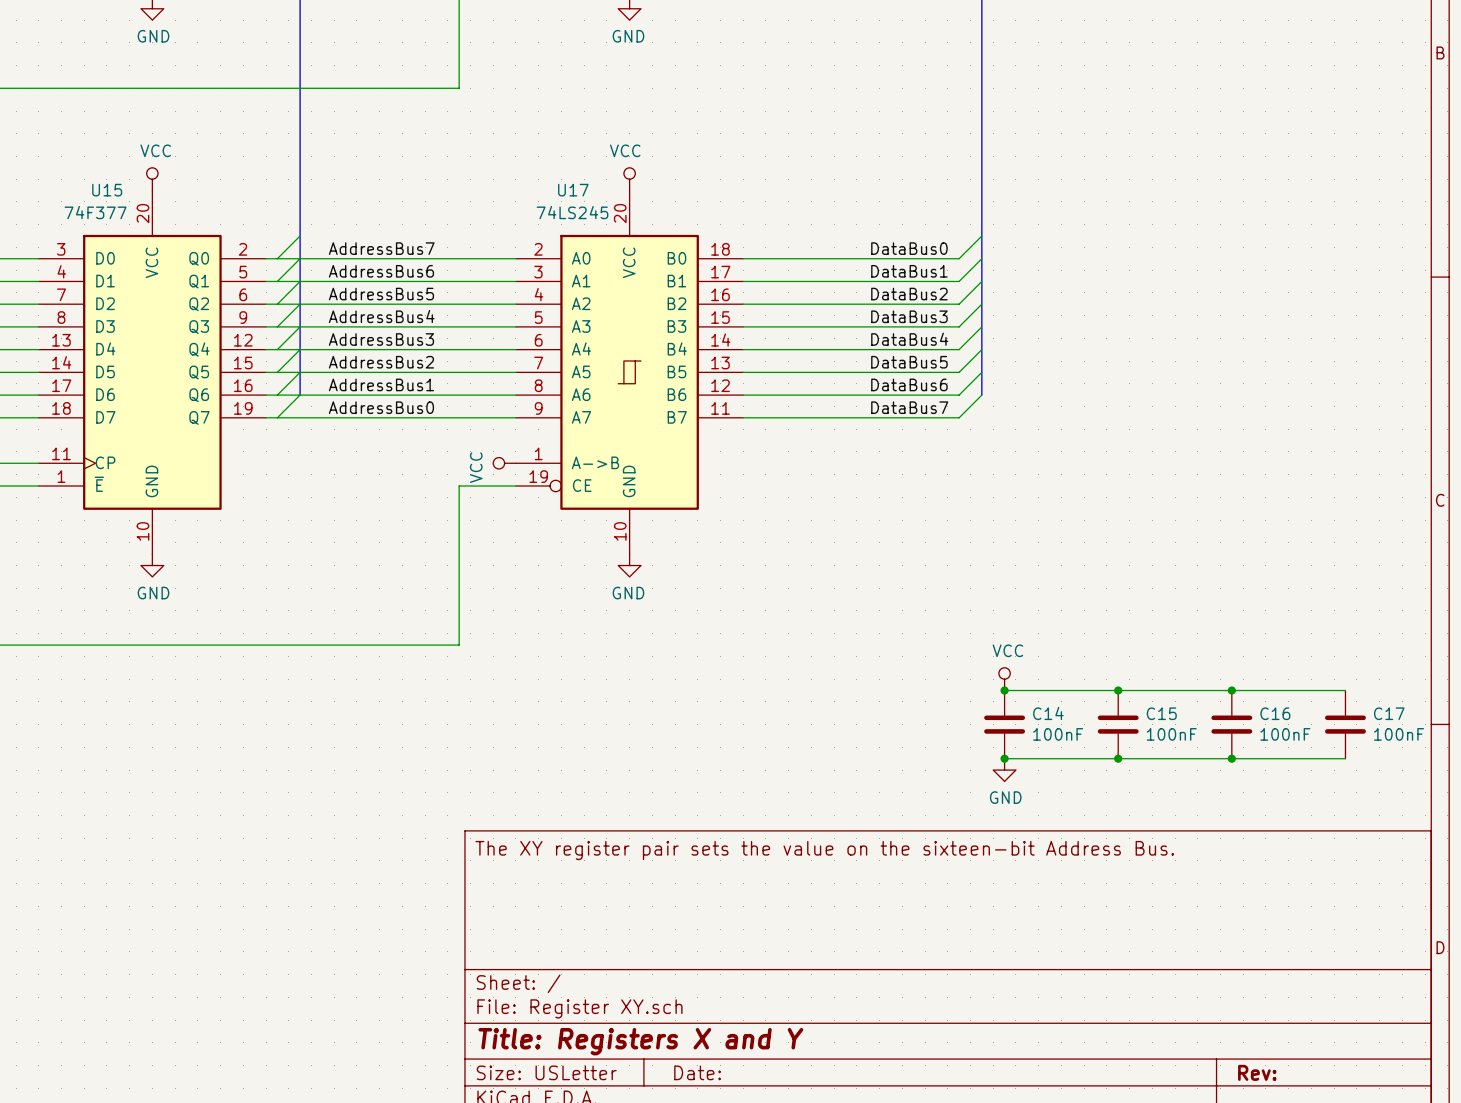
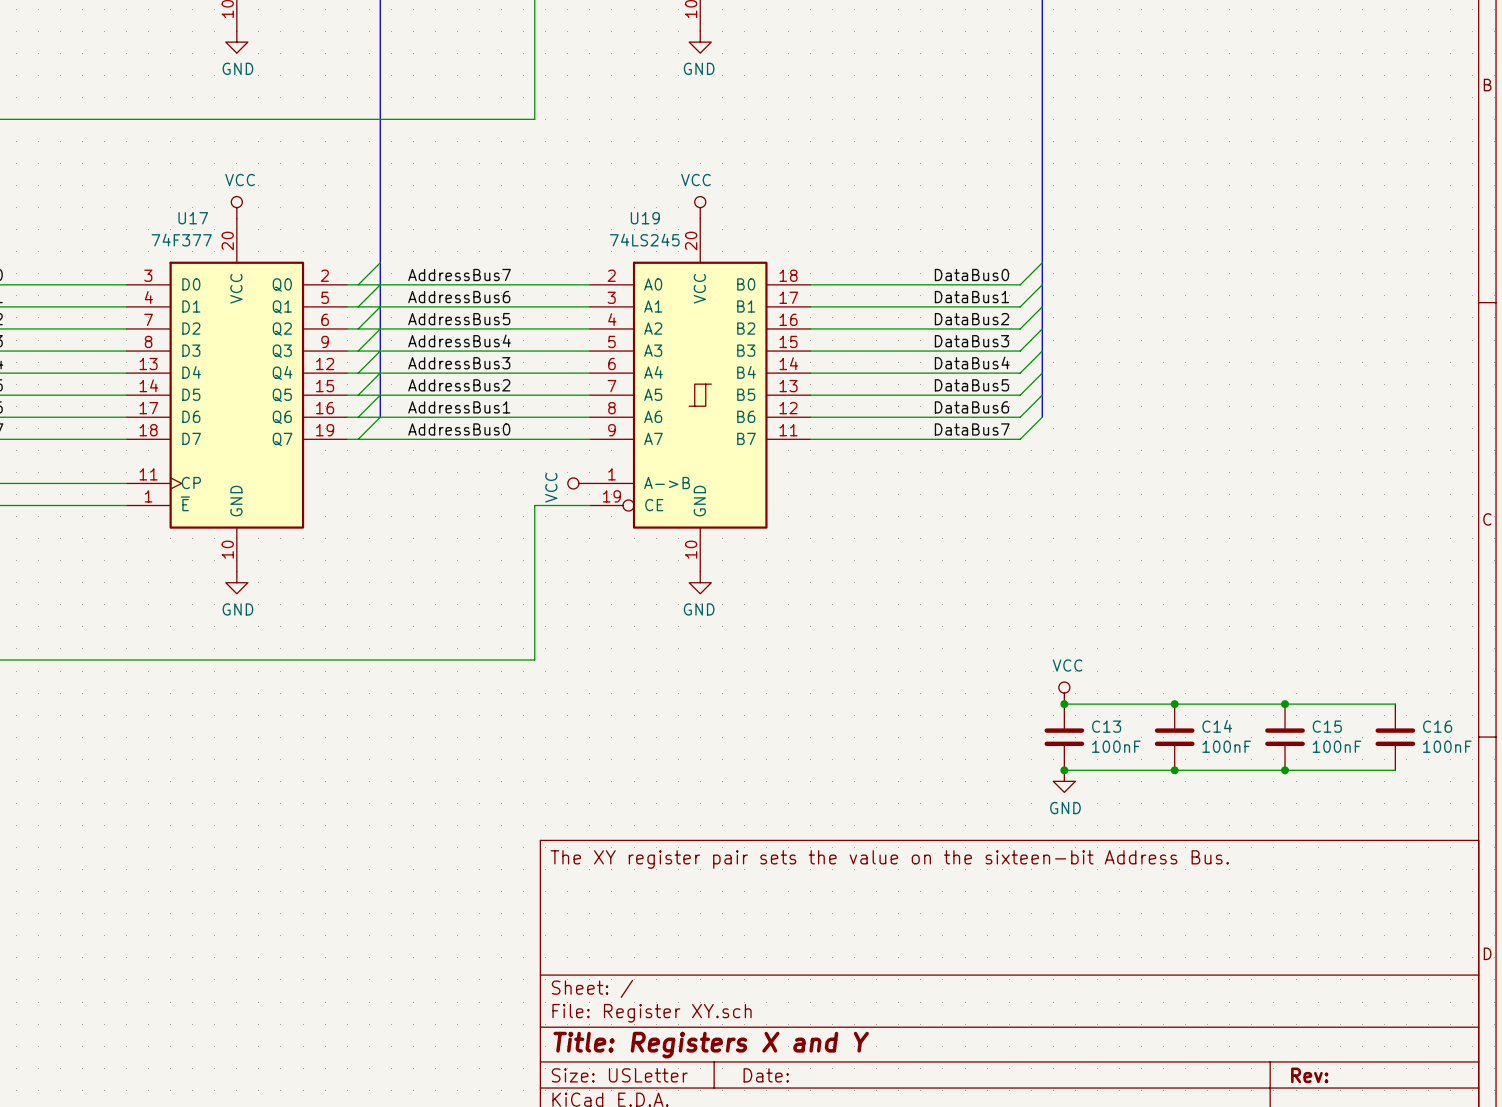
U15 name: U15 (107, 190) -> U17 (193, 218)
U17 name: U17 (573, 190) -> U19 (645, 218)
C14 name: C14 (1048, 713) -> C13 (1106, 726)
C15 name: C15 (1161, 713) -> C14 (1217, 726)
C16 name: C16 (1275, 713) -> C15 (1327, 726)
C17 name: C17 (1389, 713) -> C16 (1437, 726)

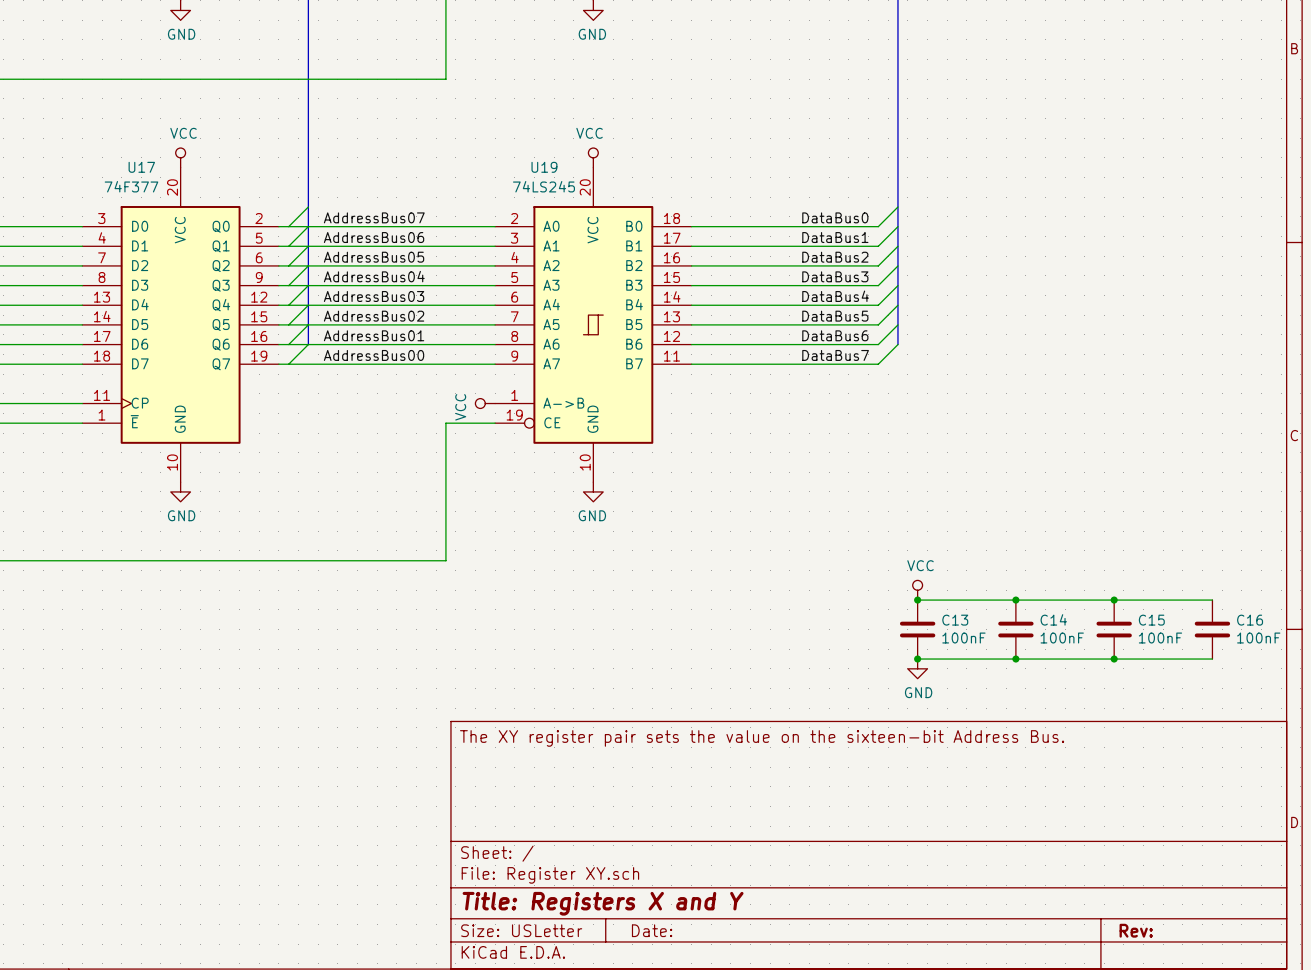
label: AddressBus7 (459, 274) -> AddressBus07 (374, 217)
label: AddressBus6 (459, 297) -> AddressBus06 (374, 237)
label: AddressBus5 (459, 319) -> AddressBus05 (374, 257)
label: AddressBus4 (459, 340) -> AddressBus04 (374, 276)
label: AddressBus3 (459, 363) -> AddressBus03 (374, 296)
label: AddressBus2 (459, 385) -> AddressBus02 (374, 316)
label: AddressBus1 (459, 407) -> AddressBus01 (374, 335)
label: AddressBus0 (459, 429) -> AddressBus00 (374, 355)

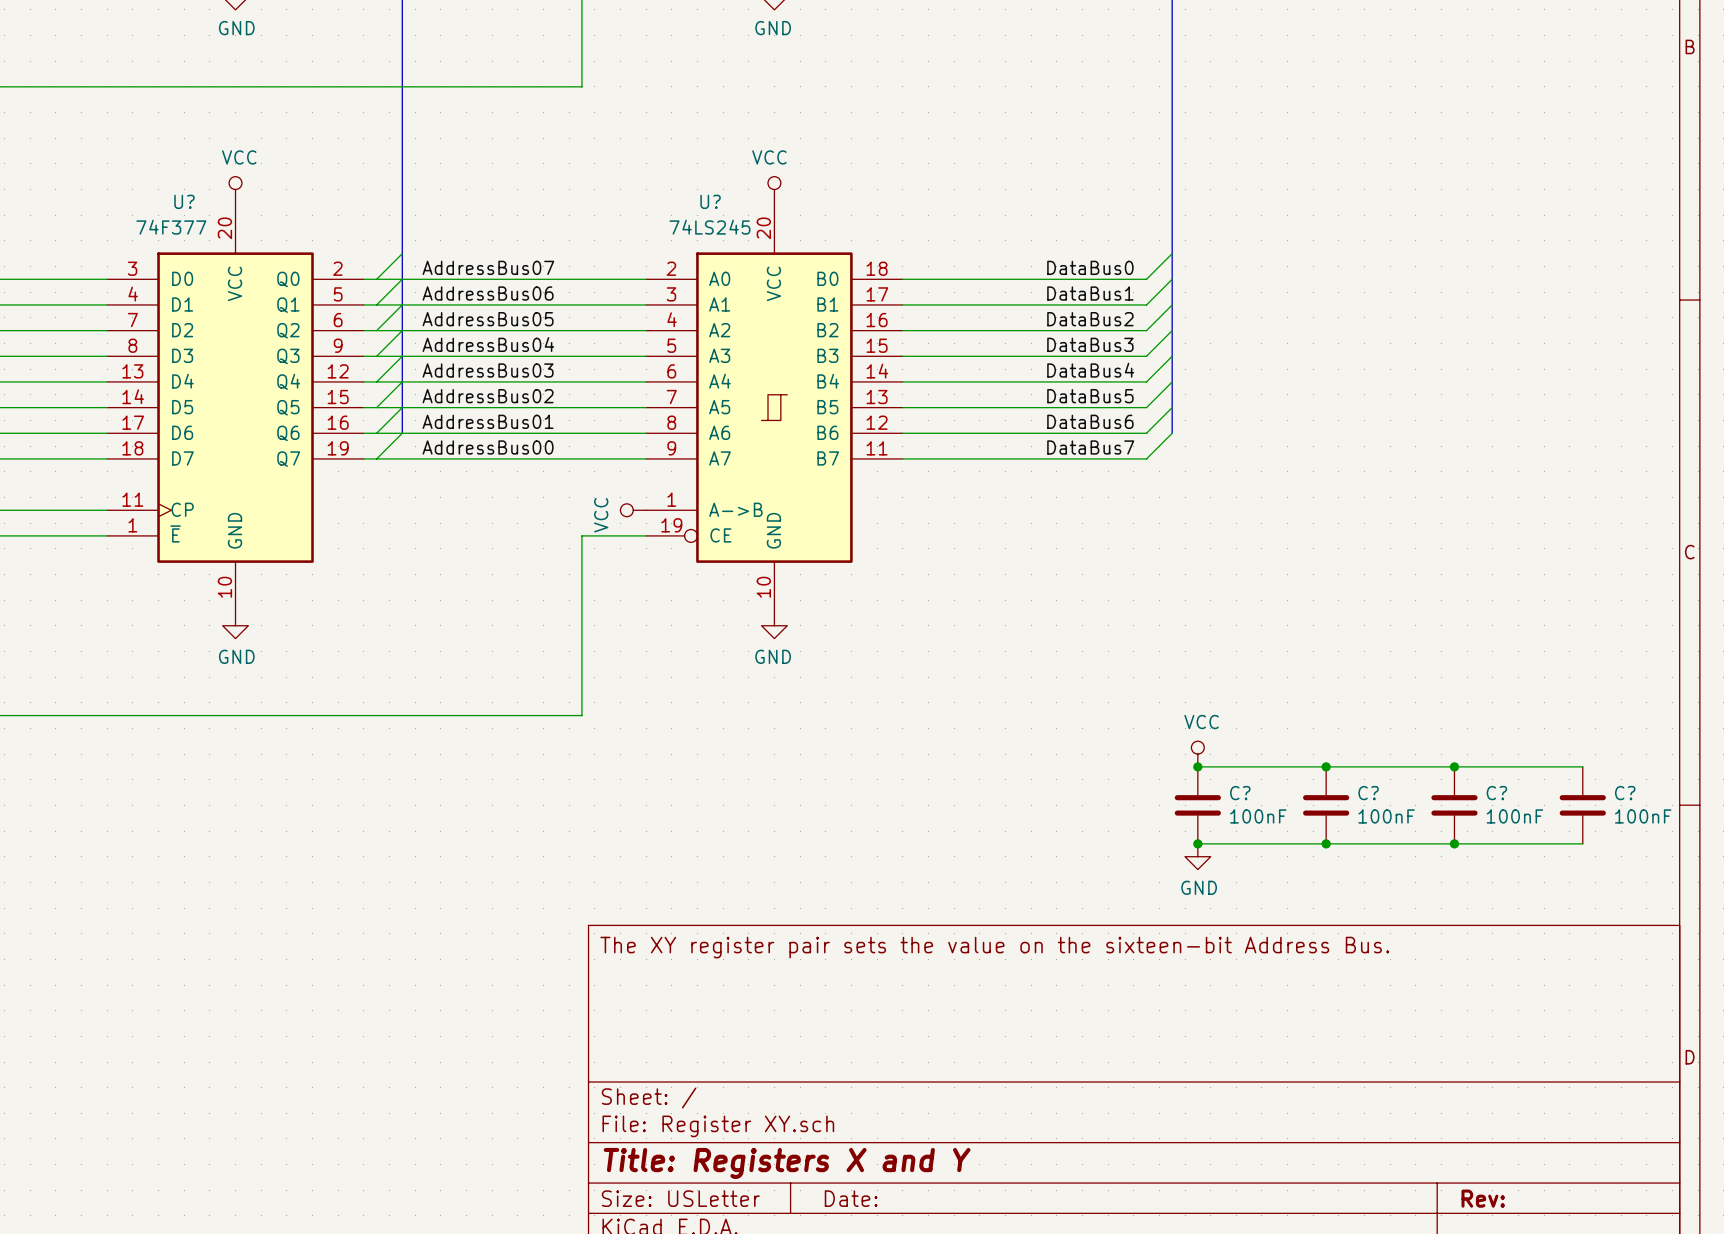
U17 name: U17 (141, 167) -> U? (184, 201)
U19 name: U19 (544, 167) -> U? (710, 201)
C14 name: C14 (1053, 619) -> C? (1368, 793)
C13 name: C13 (955, 620) -> C? (1240, 793)
C15 name: C15 (1151, 620) -> C? (1496, 793)
C16 name: C16 (1250, 620) -> C? (1625, 793)

